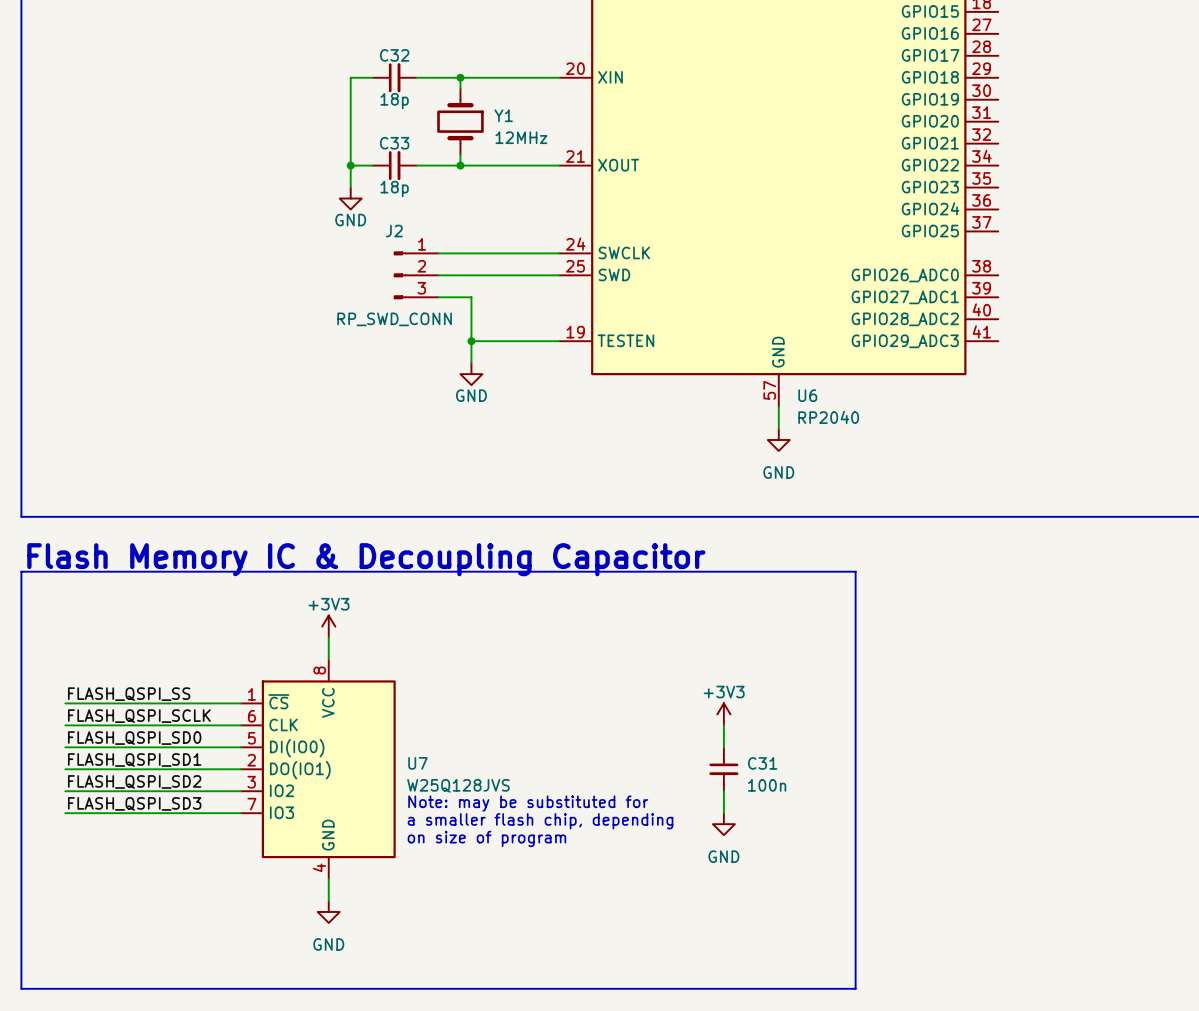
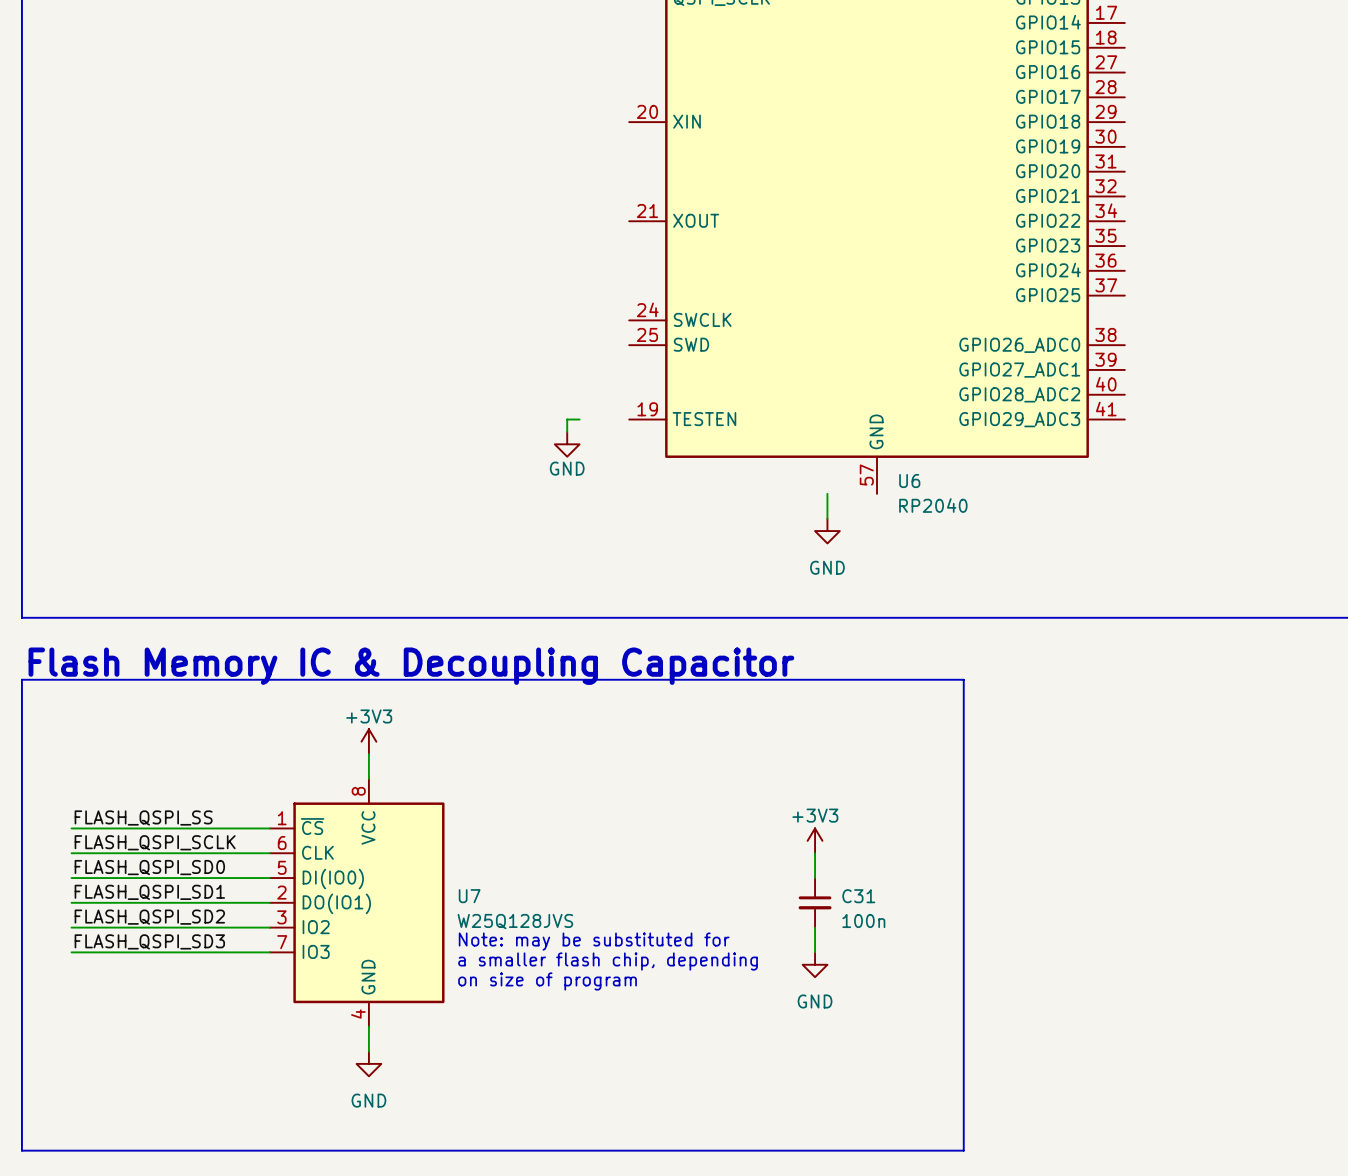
wire: (372, 77) (350, 77) (350, 187) -> none
C32: 18p (394, 77) -> none
wire: (416, 77) (559, 77) -> none
wire: (460, 77) (460, 88) -> none
junction: (460, 77) -> none
Y1: 12MHz (460, 121) -> none
wire: (460, 154) (460, 165) -> none
wire: (350, 165) (372, 165) -> none
junction: (350, 165) -> none
C33: 18p (394, 165) -> none
wire: (416, 165) (559, 165) -> none
junction: (460, 165) -> none
power symbol: GND (350, 198) -> none
wire: (438, 253) (559, 253) -> none
J2: RP_SWD_CONN (416, 275) -> none
wire: (438, 275) (559, 275) -> none
wire: (438, 297) (471, 297) (471, 363) -> none
wire: (471, 341) (504, 341) -> (567, 431) (567, 419)
junction: (471, 341) -> none
wire: (515, 341) (559, 341) -> none
power symbol position: GND (471, 374) -> GND (567, 444)
wire: (778, 407) (778, 429) -> (827, 493) (827, 518)
power symbol position: GND (778, 439) -> GND (827, 531)

